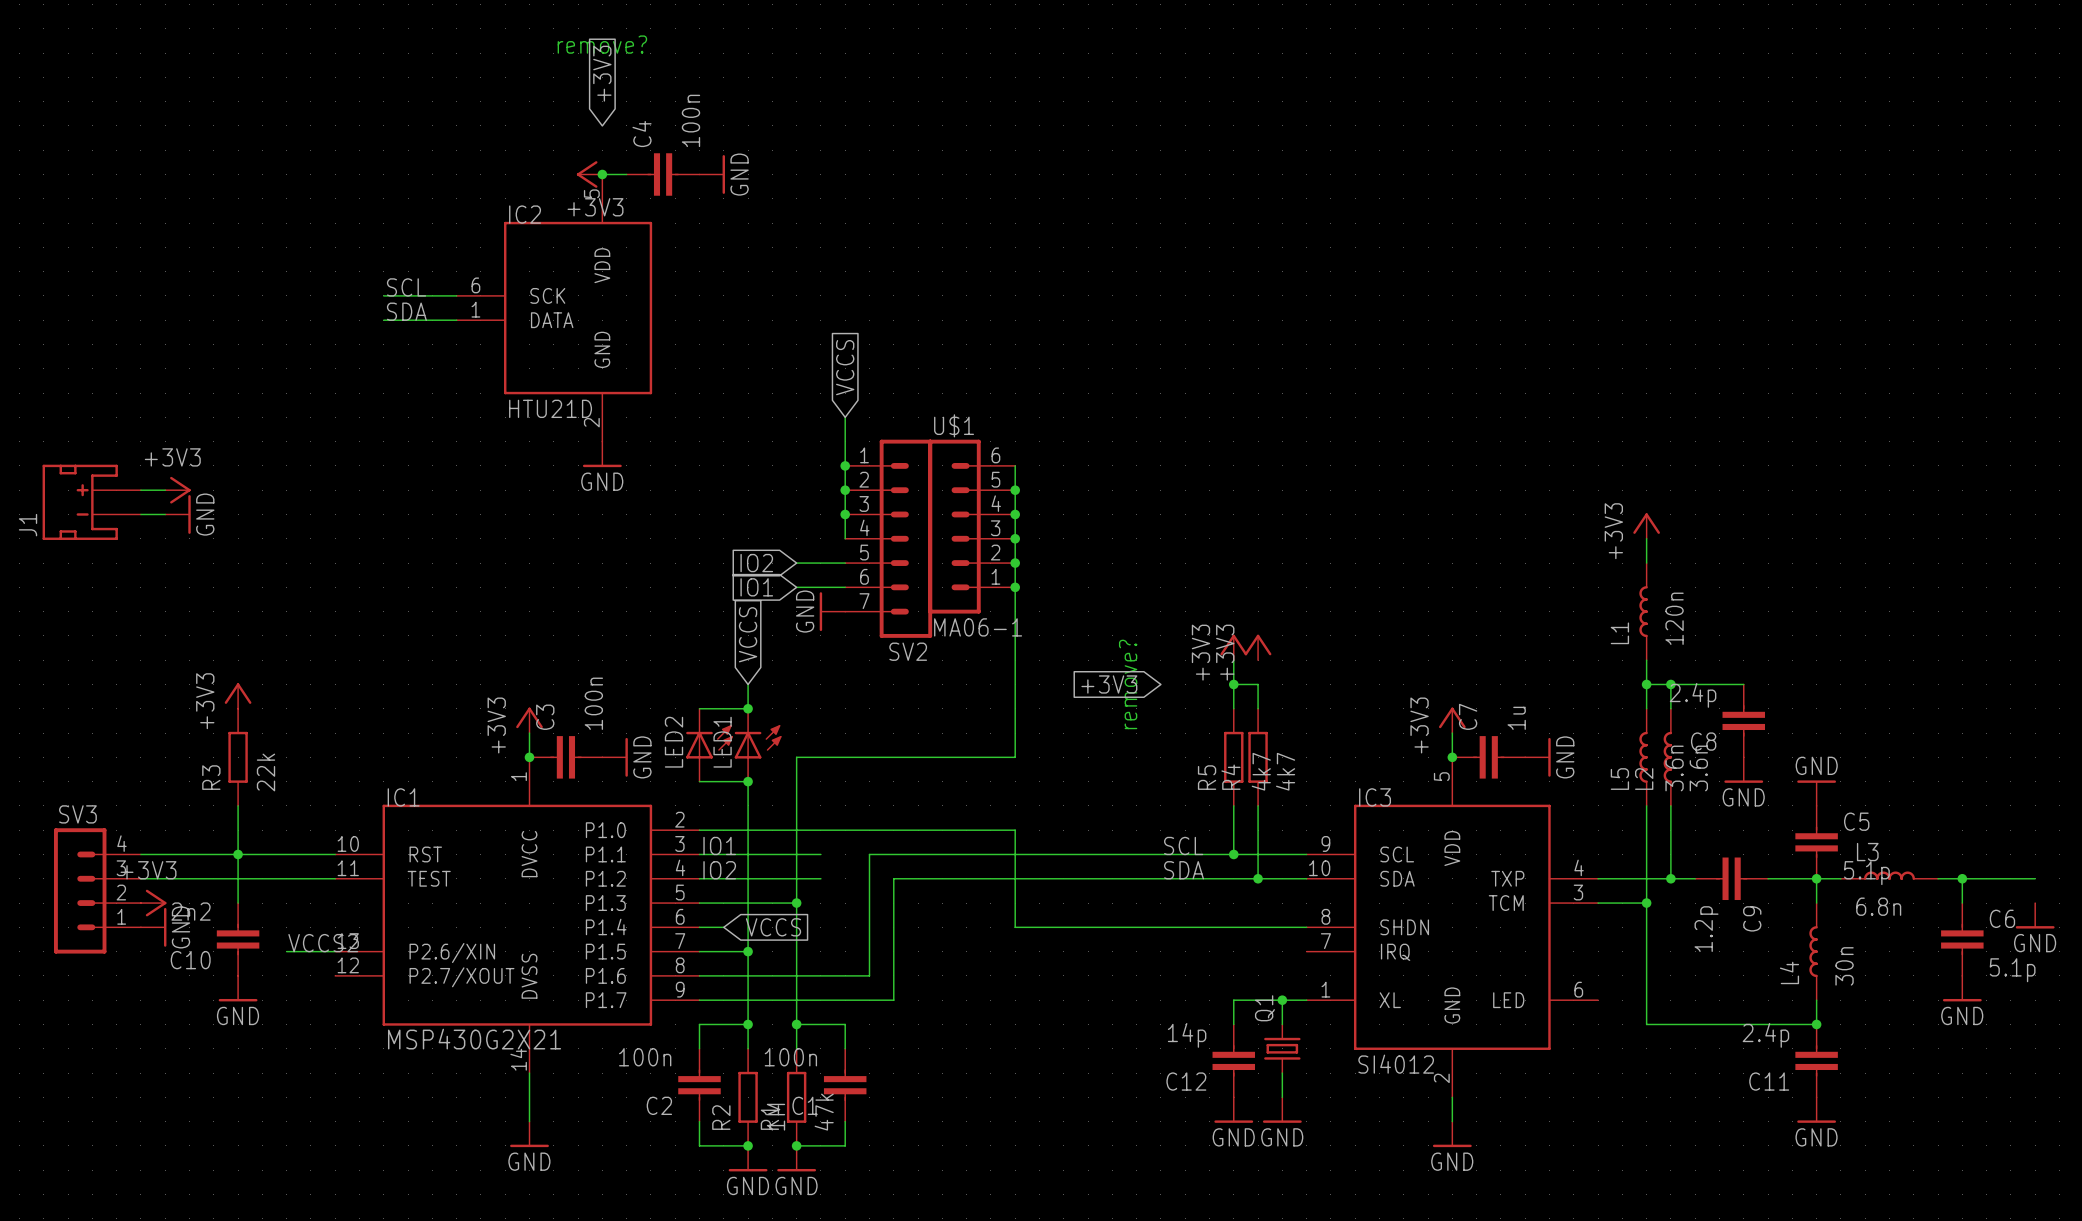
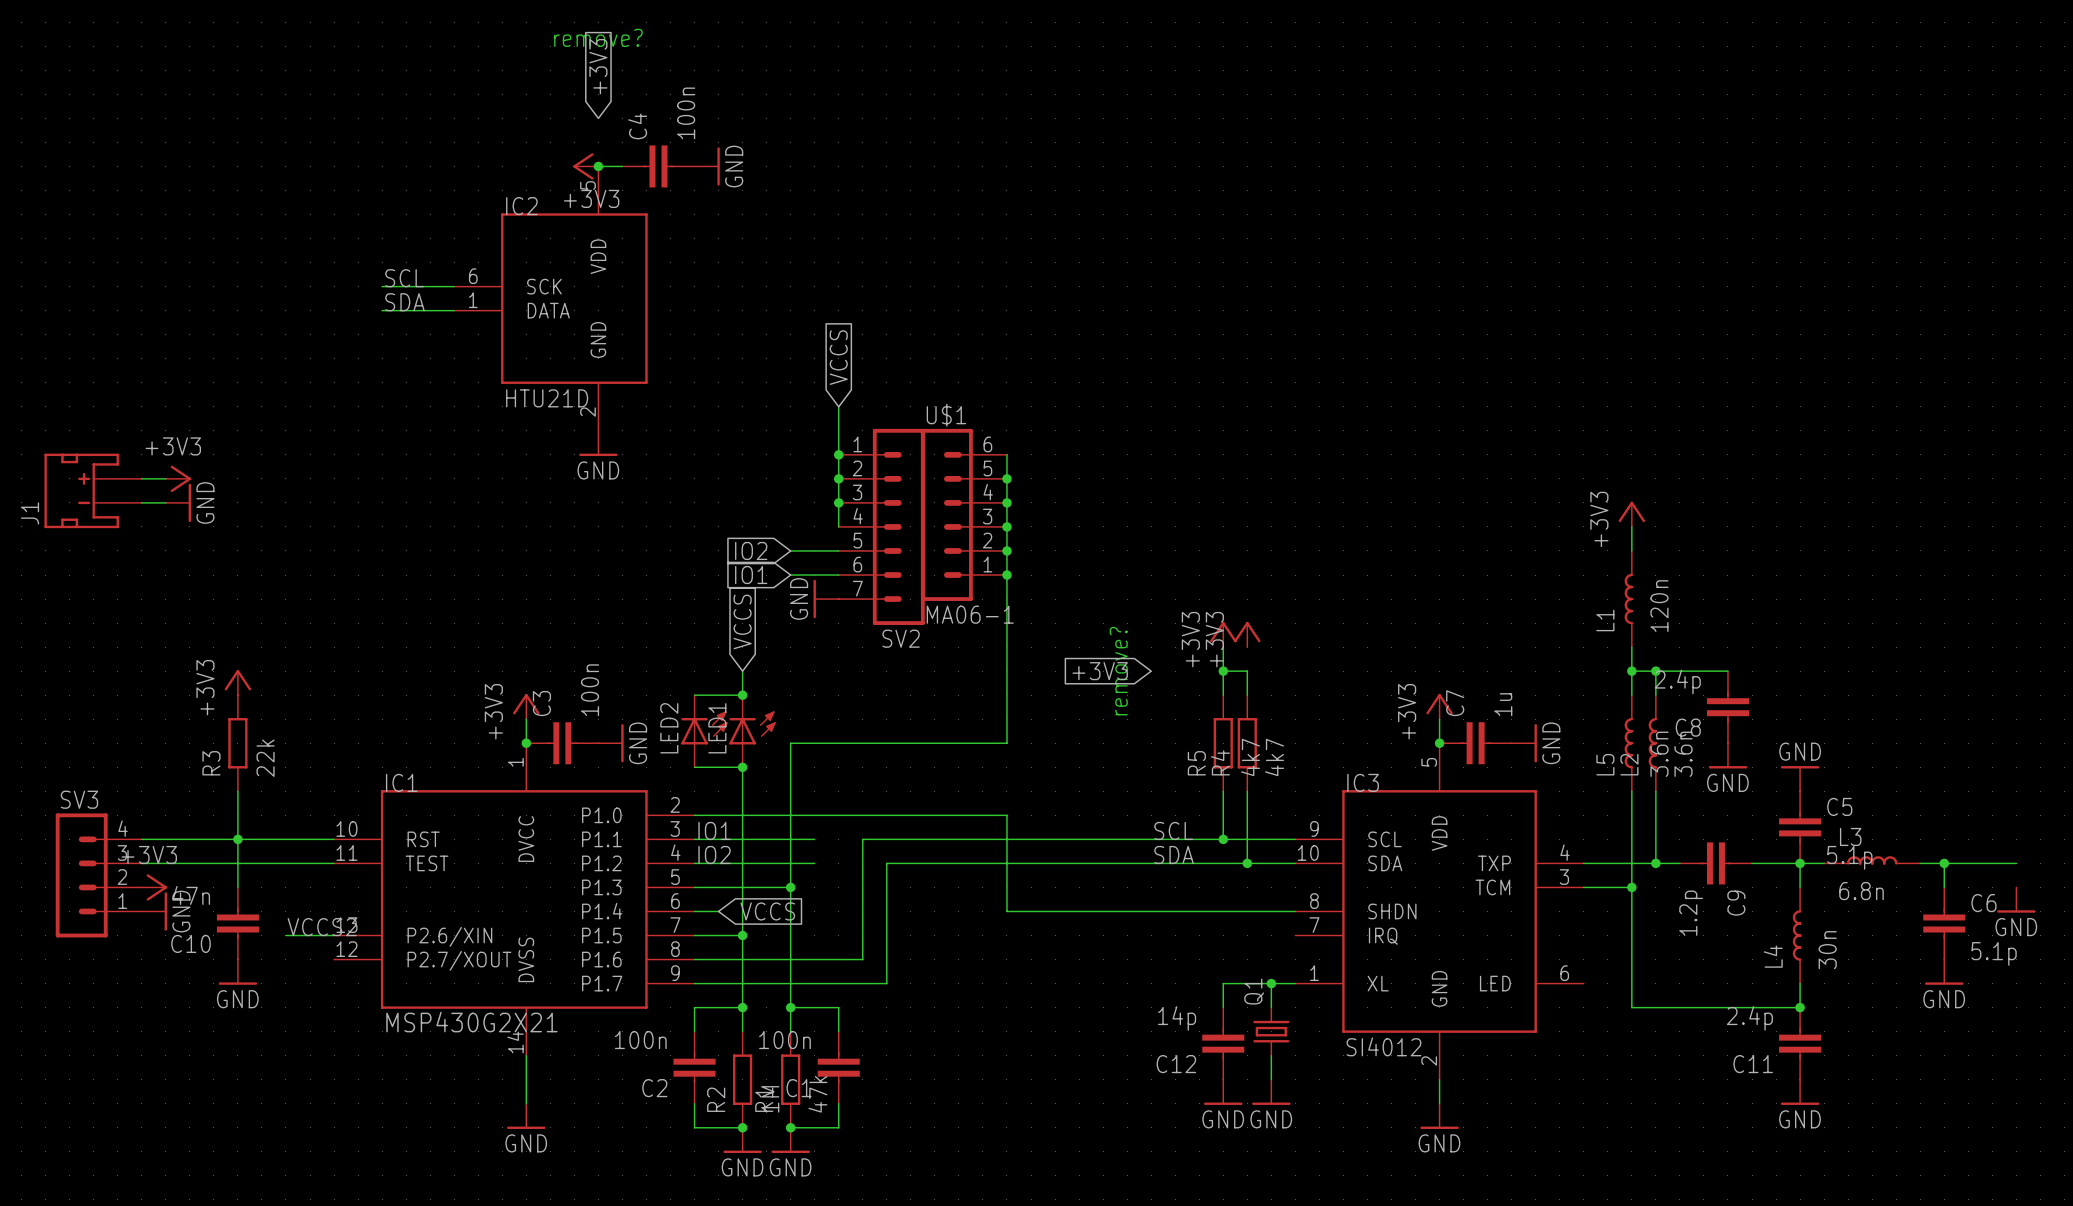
C10 value: 2n2 (191, 911) -> 47n (191, 895)

